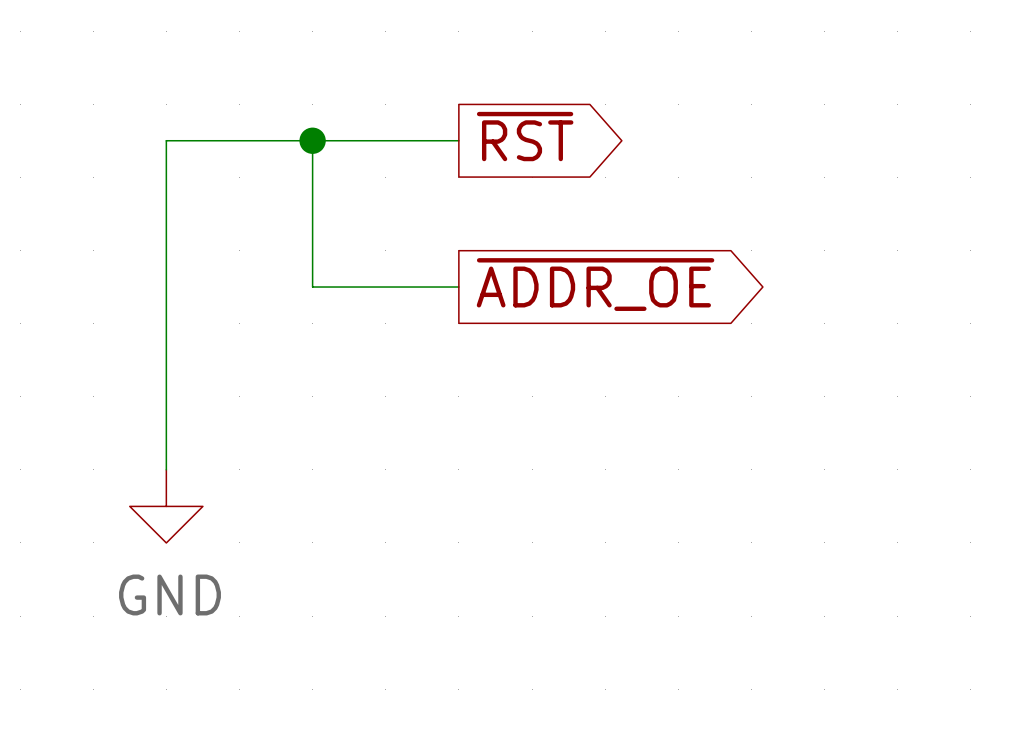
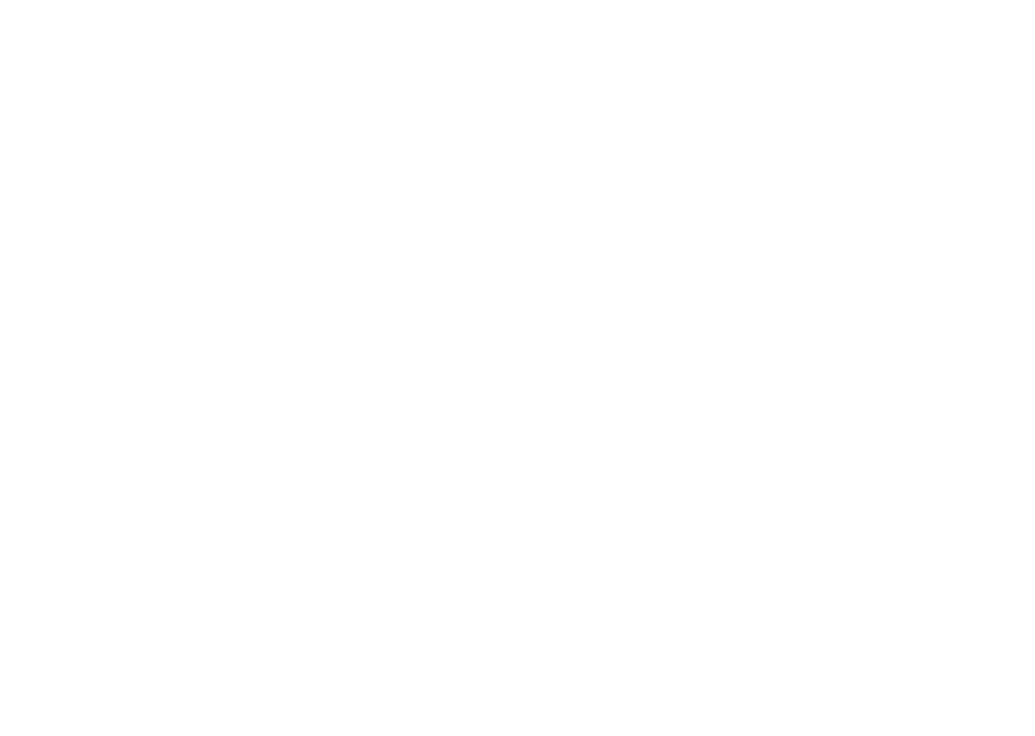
global label: ~{RST} (525, 136) -> none
wire: (312, 140) (312, 287) (458, 287) -> none
junction: (312, 140) -> none
wire: (458, 140) (166, 140) (166, 469) -> none
global label: ~{ADDR_OE} (595, 284) -> none
power symbol: GND (166, 506) -> none

